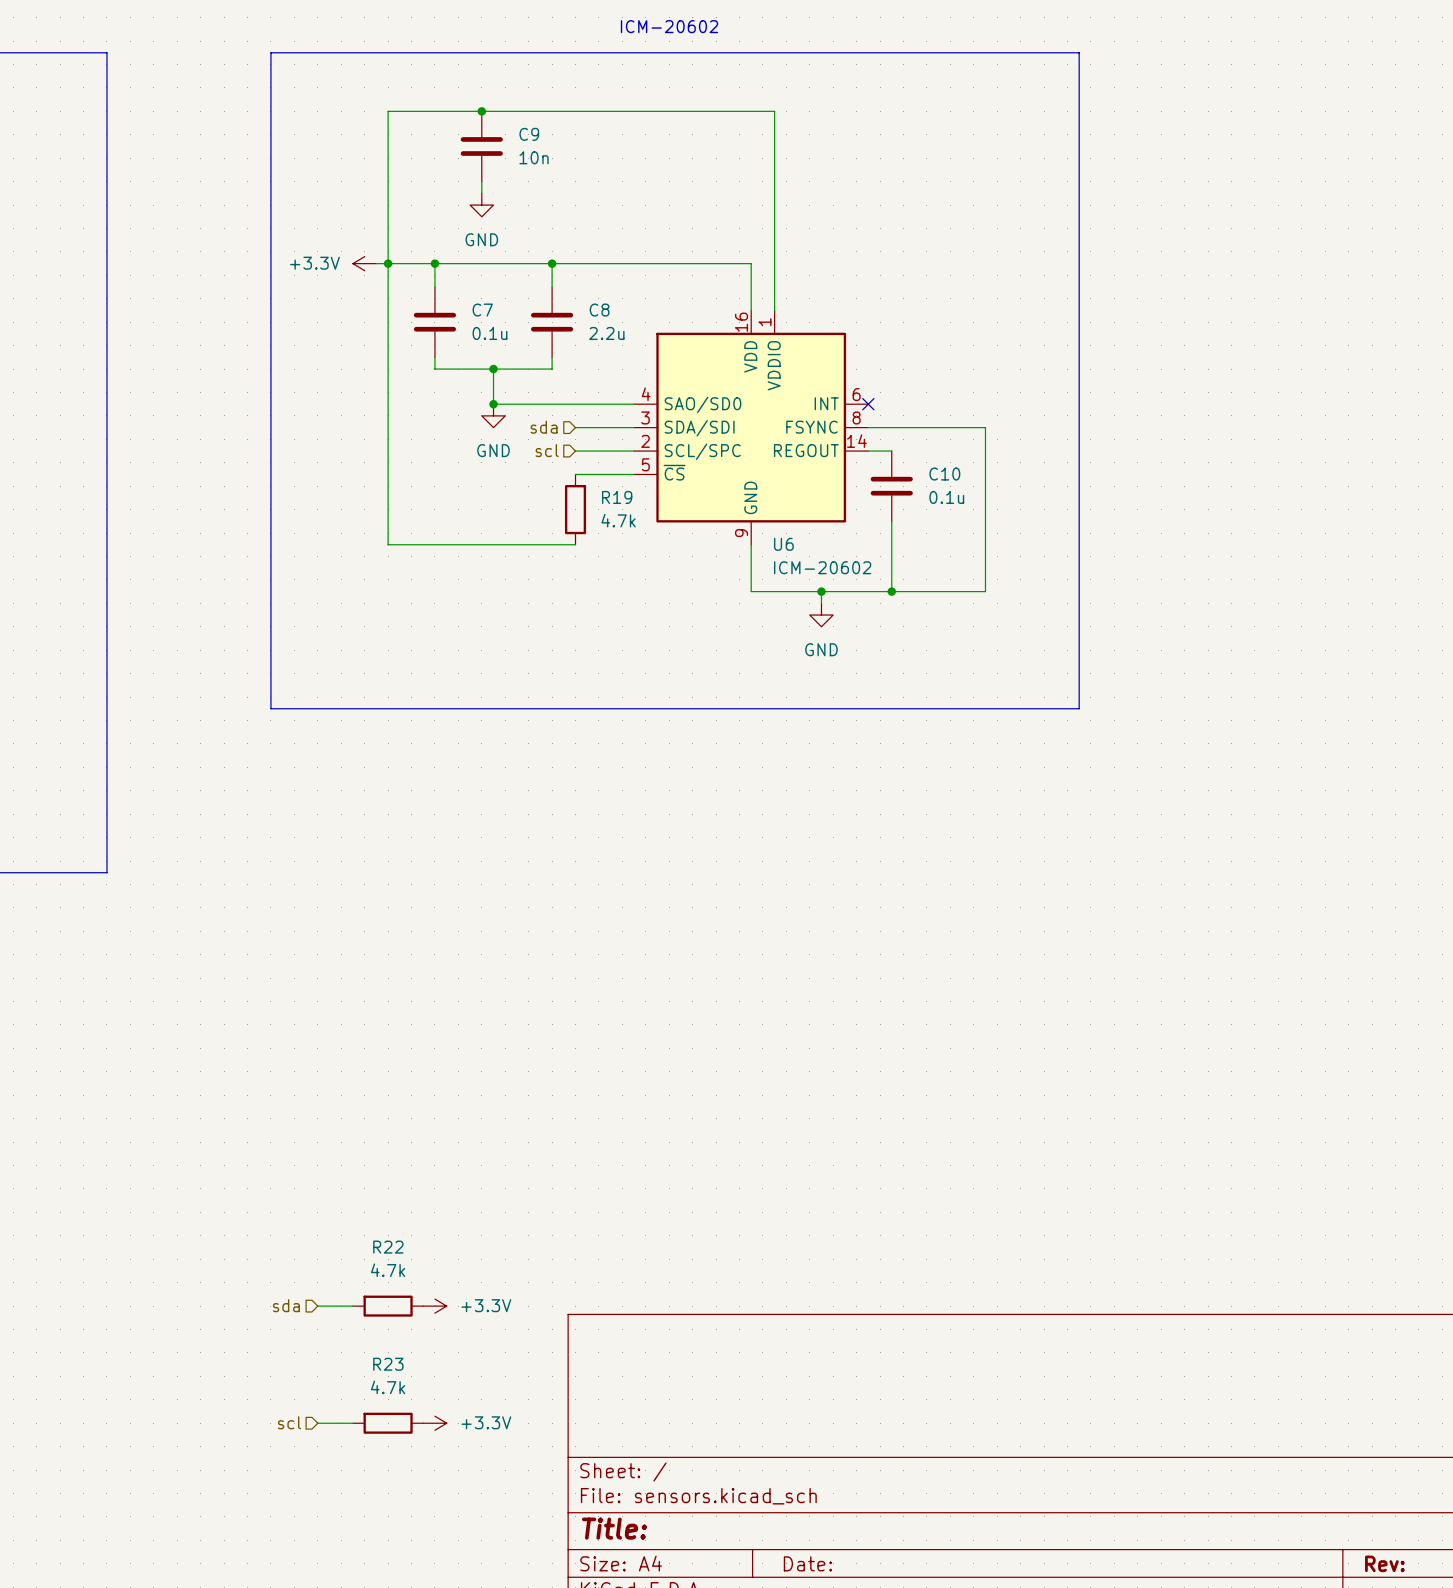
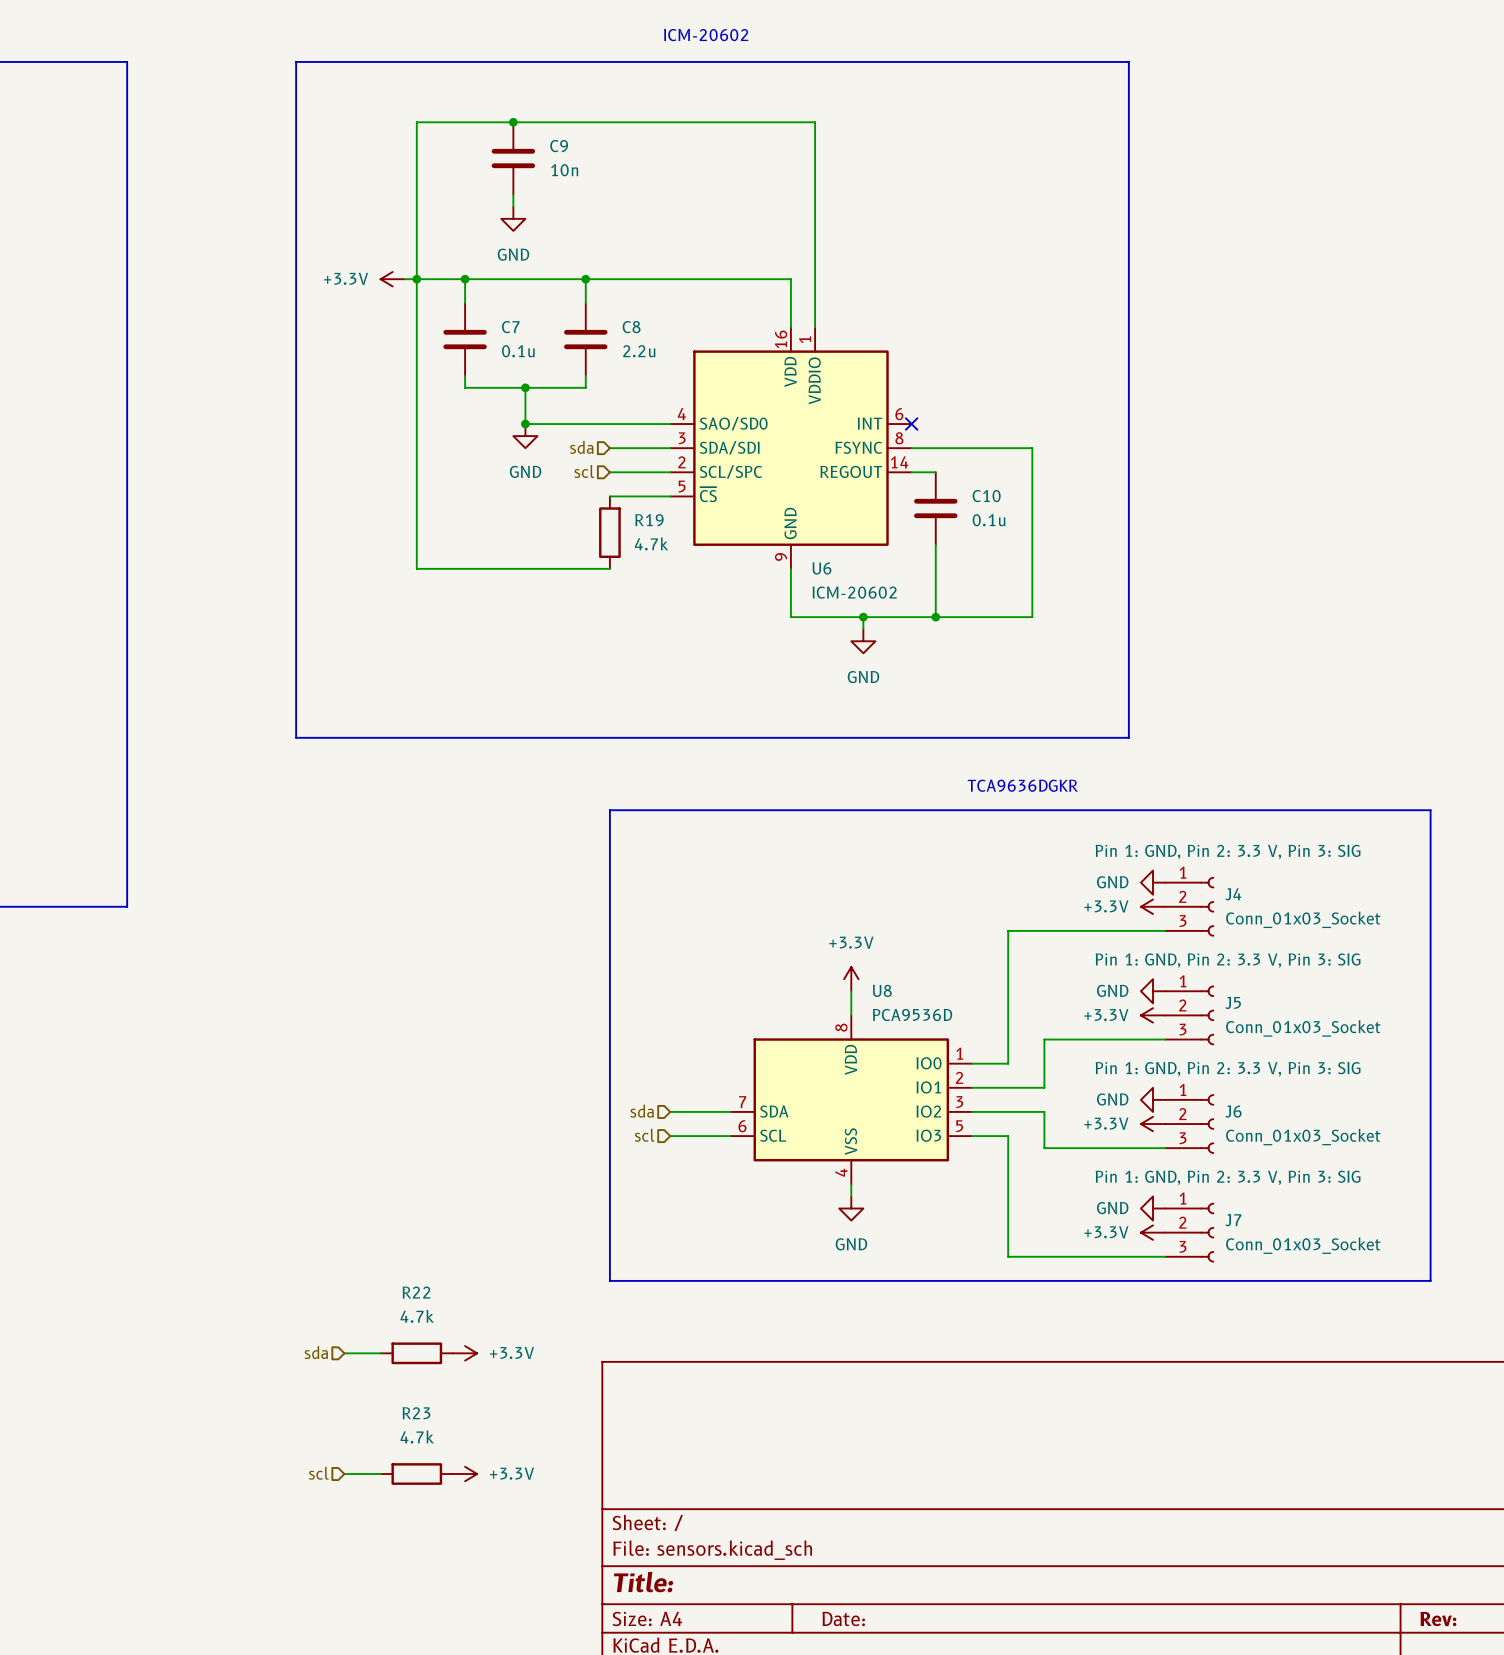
text: none -> TCA9636DGKR (1022, 785)
line: none -> (609, 810) (1430, 810) (1430, 1280) (609, 1280) (609, 810)
power symbol: none -> GND (1153, 882)
power symbol: none -> +3.3V (1153, 906)
J4: none -> Conn_01x03_Socket (1189, 906)
wire: none -> (1165, 930) (1008, 930) (1008, 1063) (971, 1063)
power symbol: none -> +3.3V (851, 979)
wire: none -> (851, 991) (851, 1015)
power symbol: none -> GND (1153, 991)
power symbol: none -> +3.3V (1153, 1015)
J5: none -> Conn_01x03_Socket (1189, 1015)
wire: none -> (1165, 1039) (1044, 1039) (1044, 1087) (971, 1087)
U8: none -> PCA9536D (851, 1099)
power symbol: none -> GND (1153, 1099)
hierarchical label: none -> sda (642, 1111)
wire: none -> (670, 1111) (730, 1111)
wire: none -> (971, 1111) (1044, 1111) (1044, 1148) (1165, 1148)
power symbol: none -> +3.3V (1153, 1124)
J6: none -> Conn_01x03_Socket (1189, 1124)
hierarchical label: none -> scl (644, 1135)
wire: none -> (670, 1136) (730, 1136)
wire: none -> (971, 1136) (1008, 1136) (1008, 1256) (1165, 1256)
wire: none -> (851, 1184) (851, 1196)
power symbol: none -> GND (851, 1208)
power symbol: none -> GND (1153, 1208)
power symbol: none -> +3.3V (1153, 1232)
J7: none -> Conn_01x03_Socket (1189, 1232)

